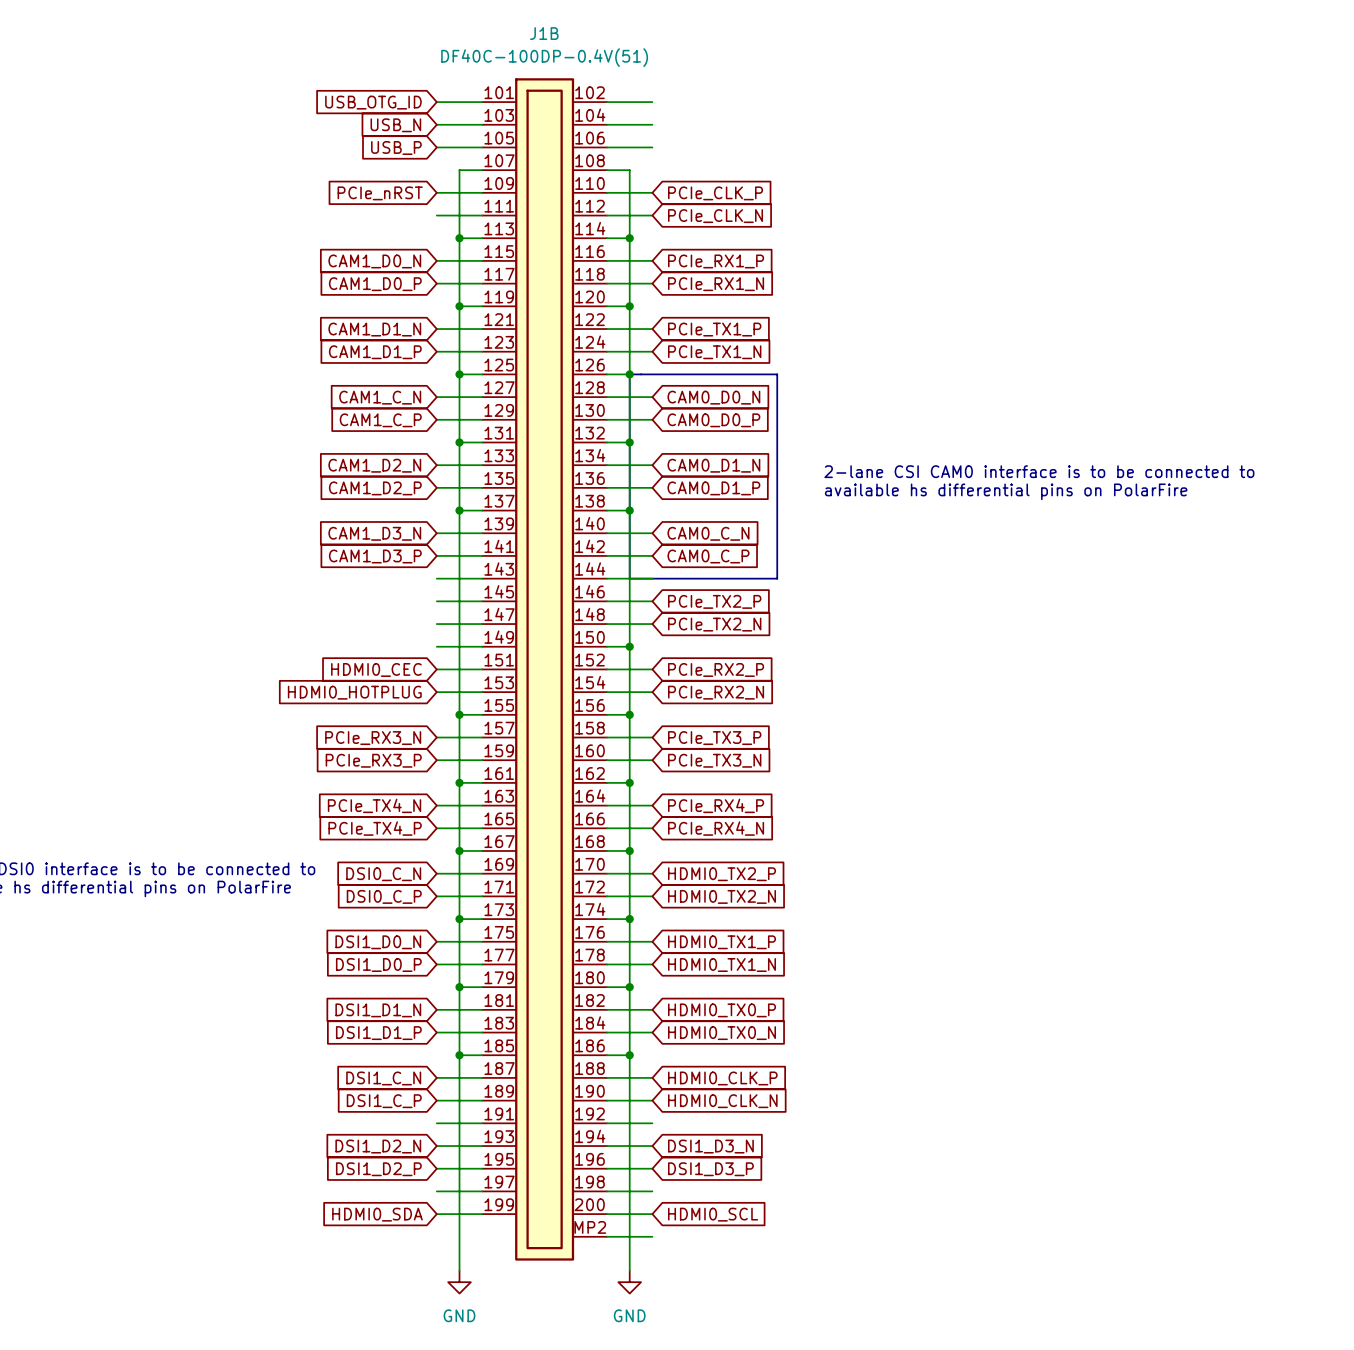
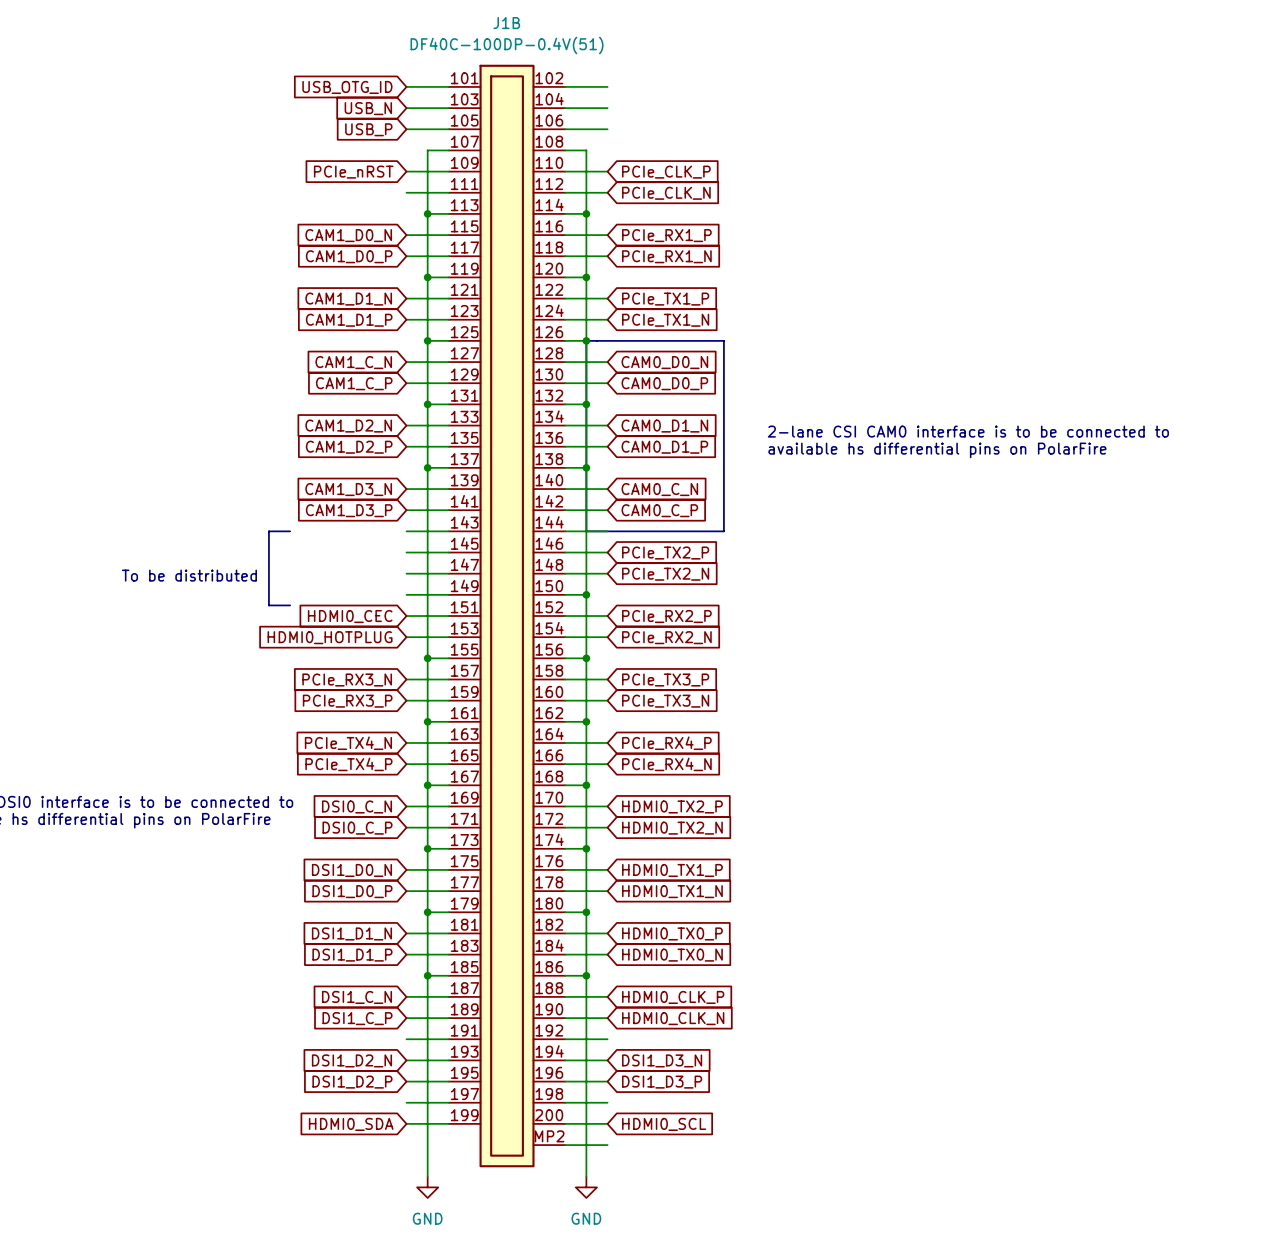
line: none -> (290, 531) (268, 531) (268, 605) (290, 605)
text: none -> To be distributed (189, 575)

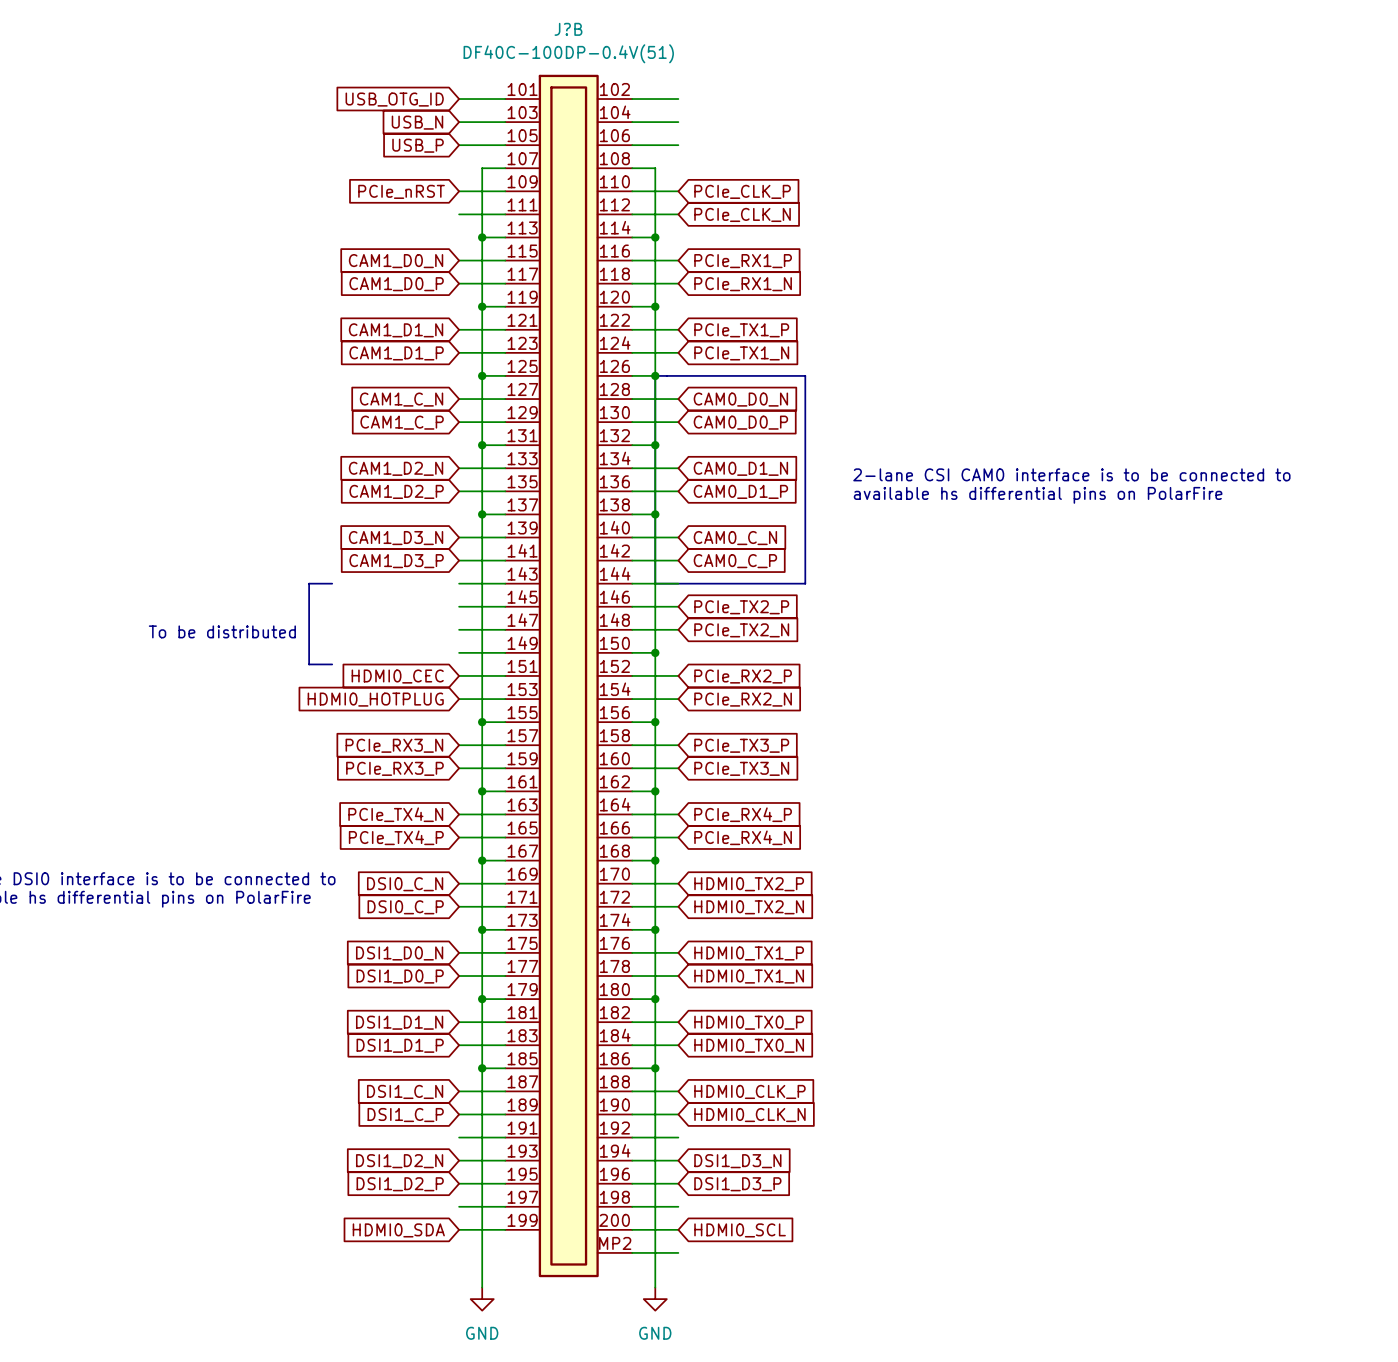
J1B name: J1B (506, 23) -> J?B (568, 29)

